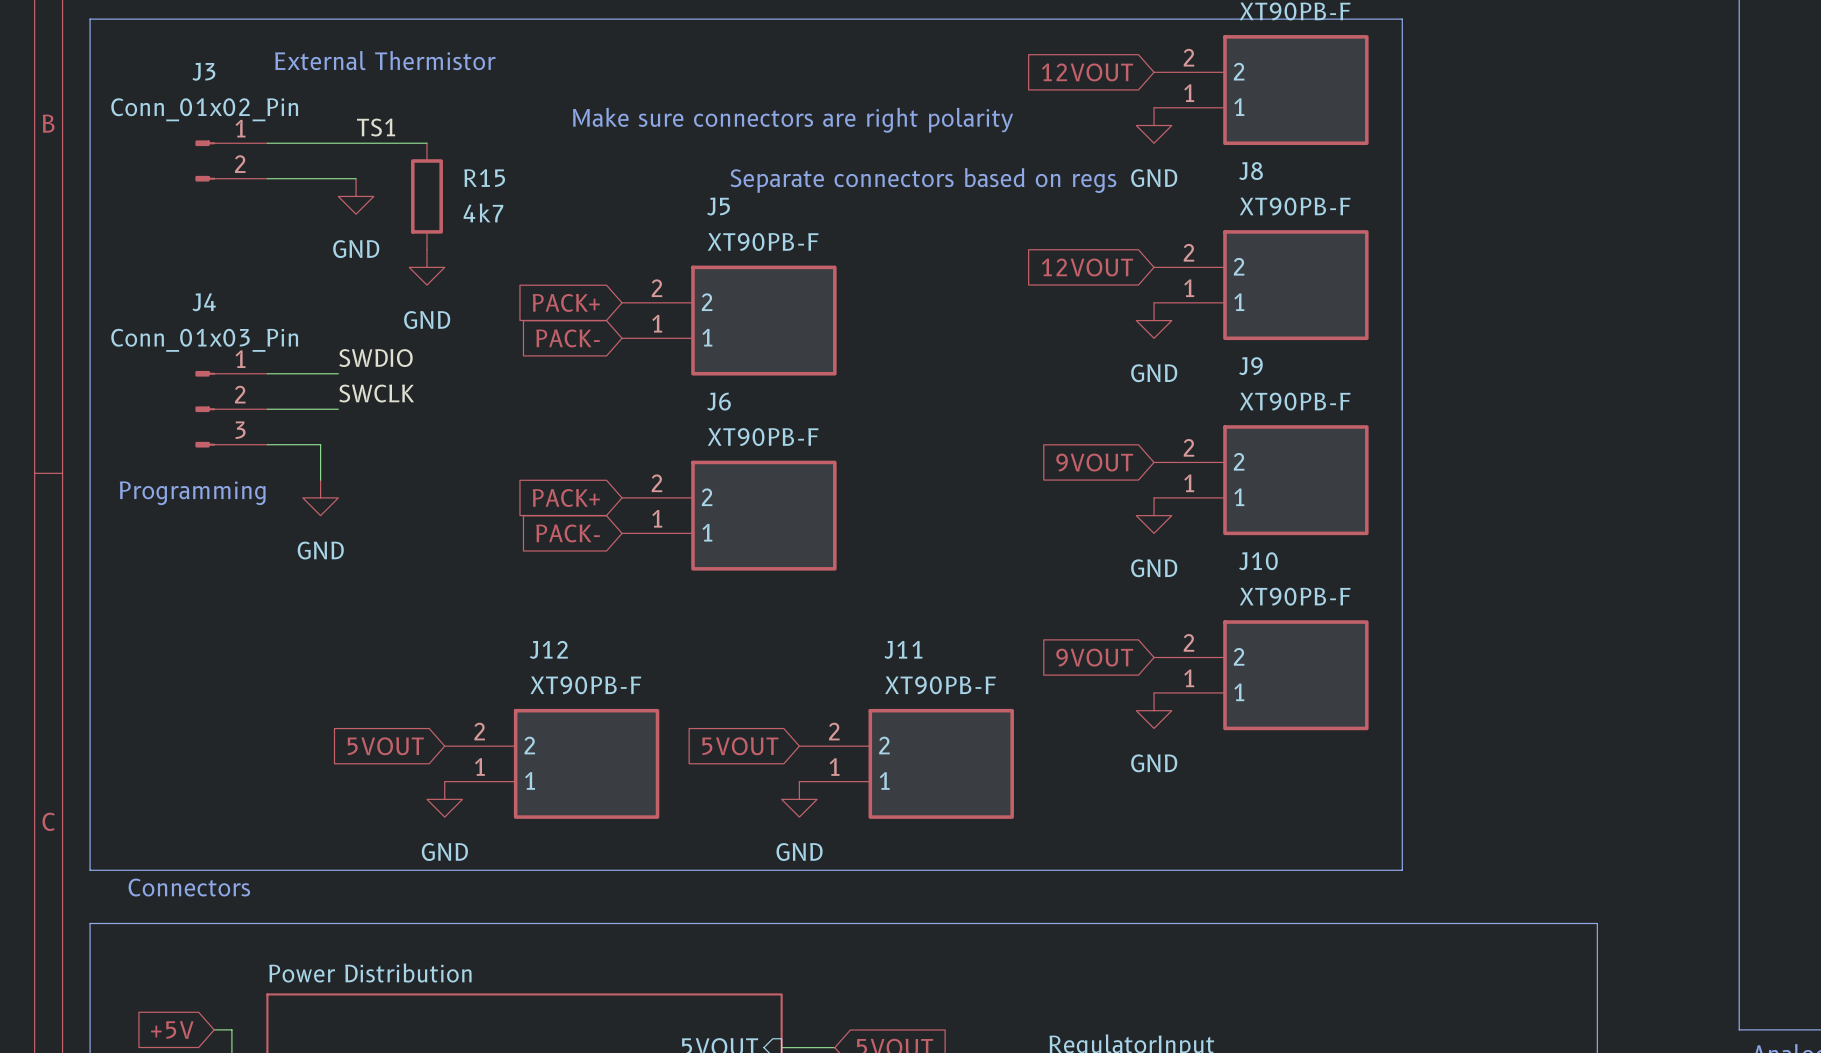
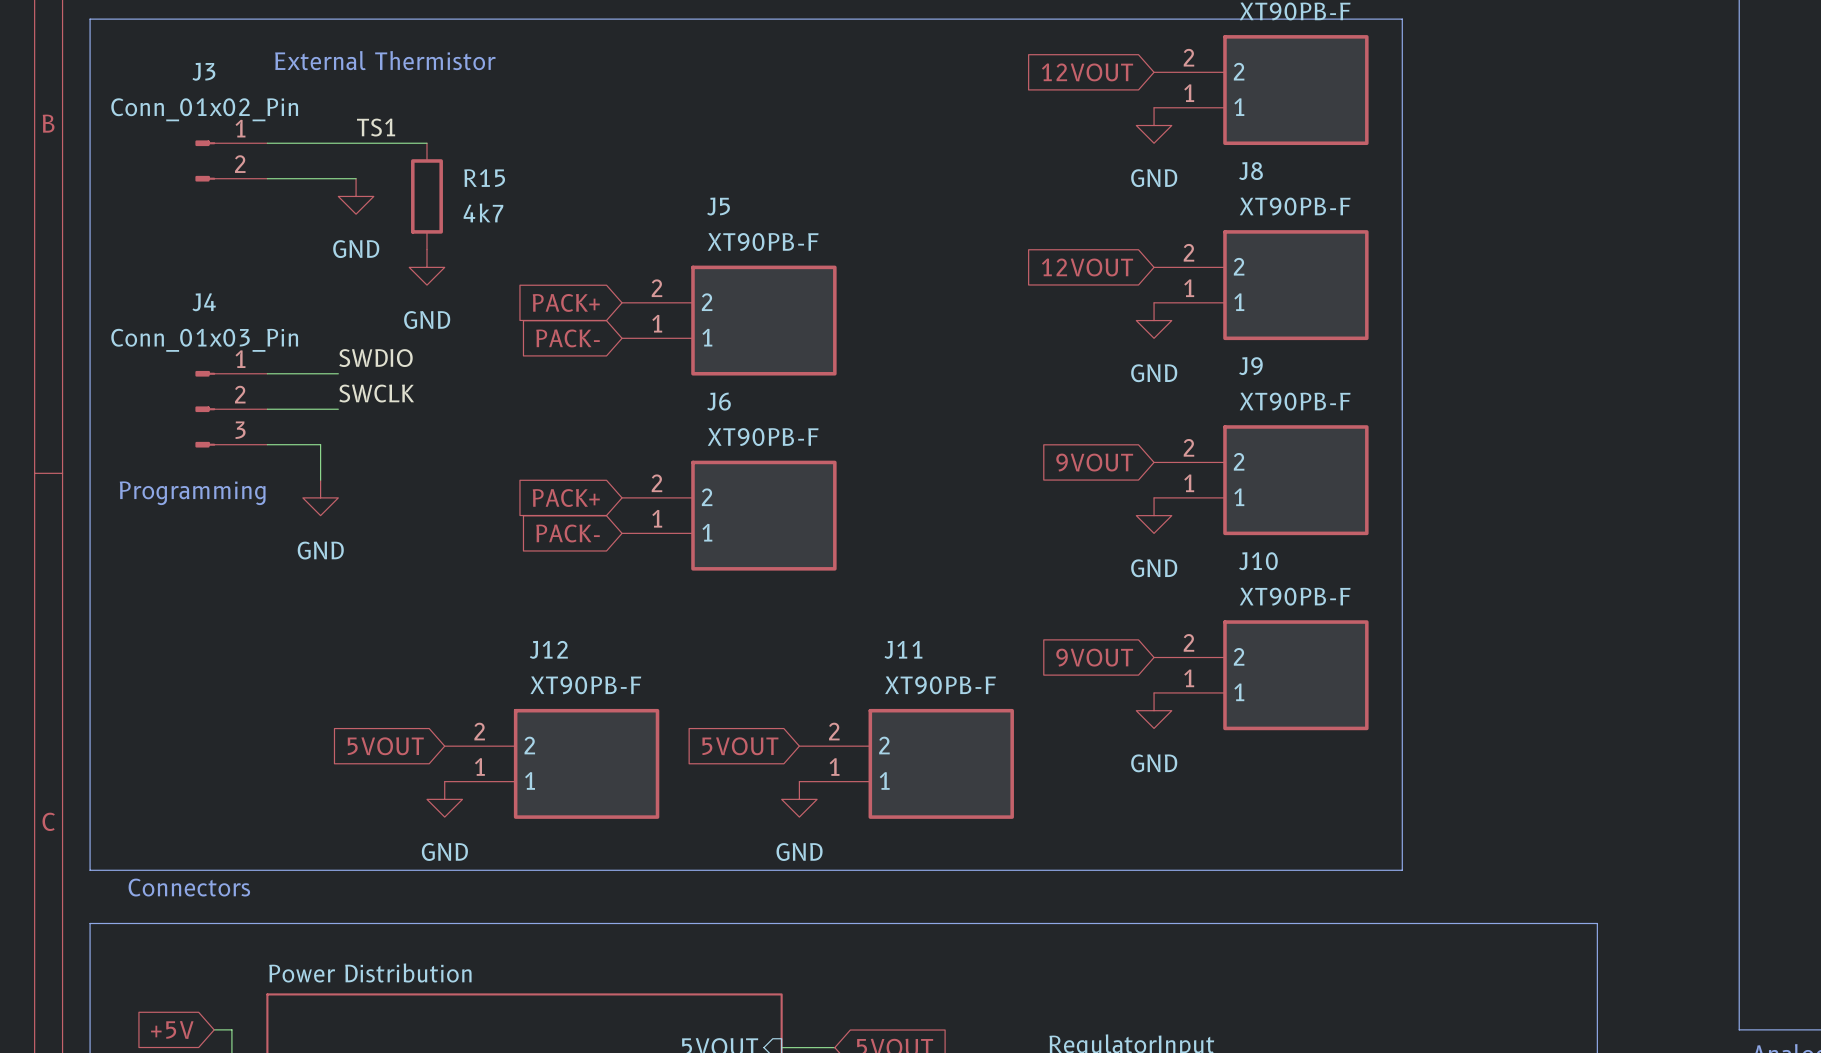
text: Make sure connectors are right polarity (793, 120) -> none
text: Separate connectors based on regs (923, 180) -> none

